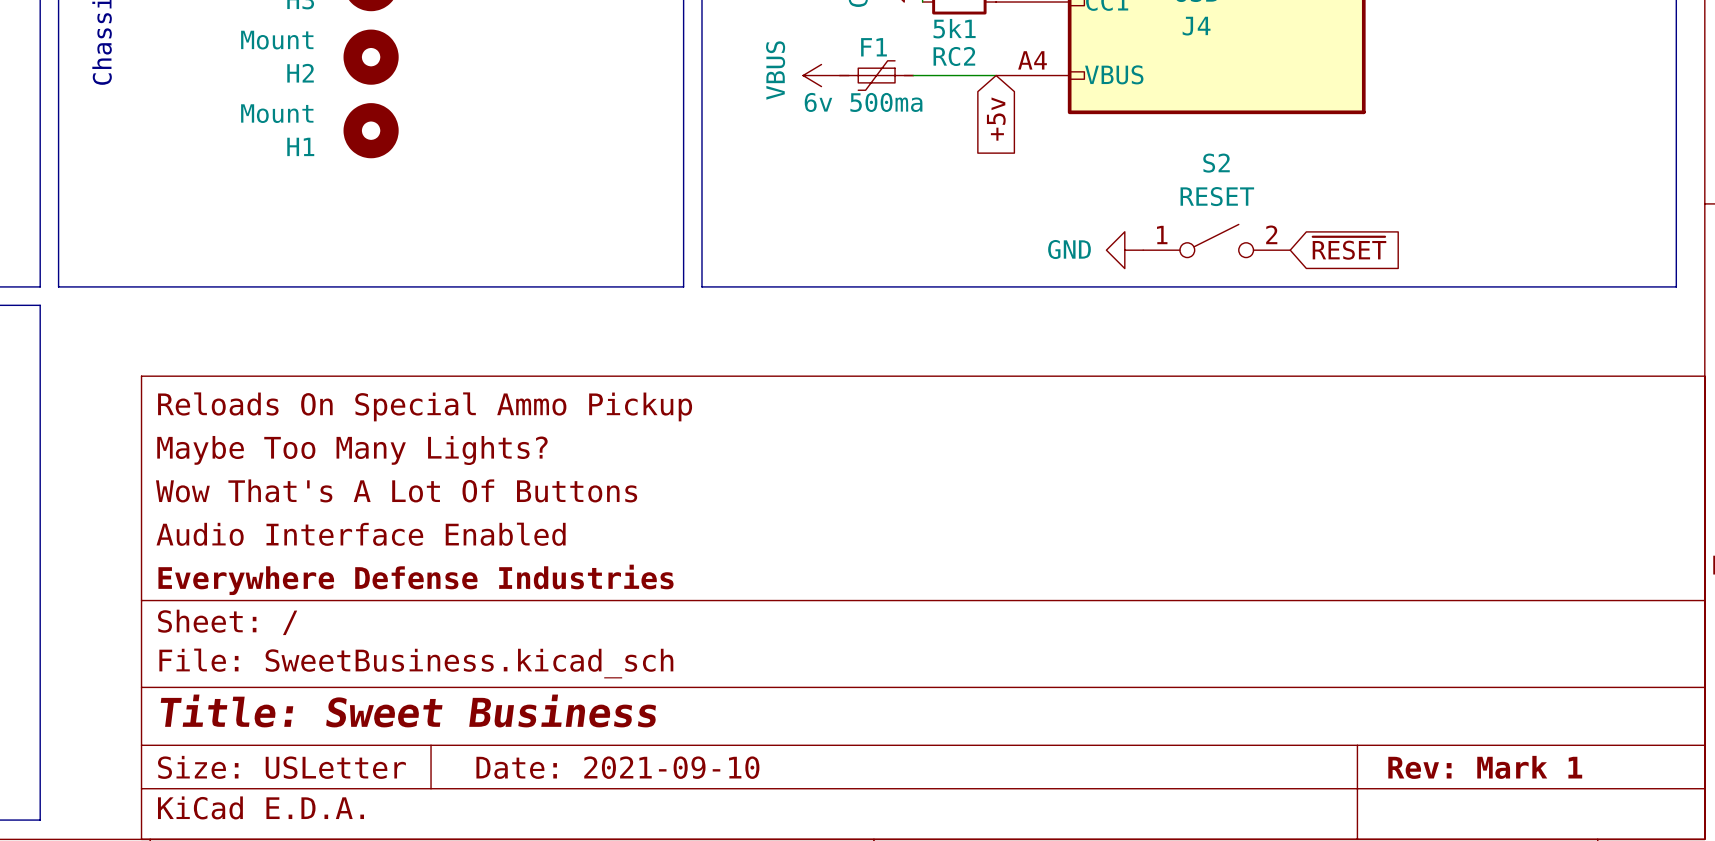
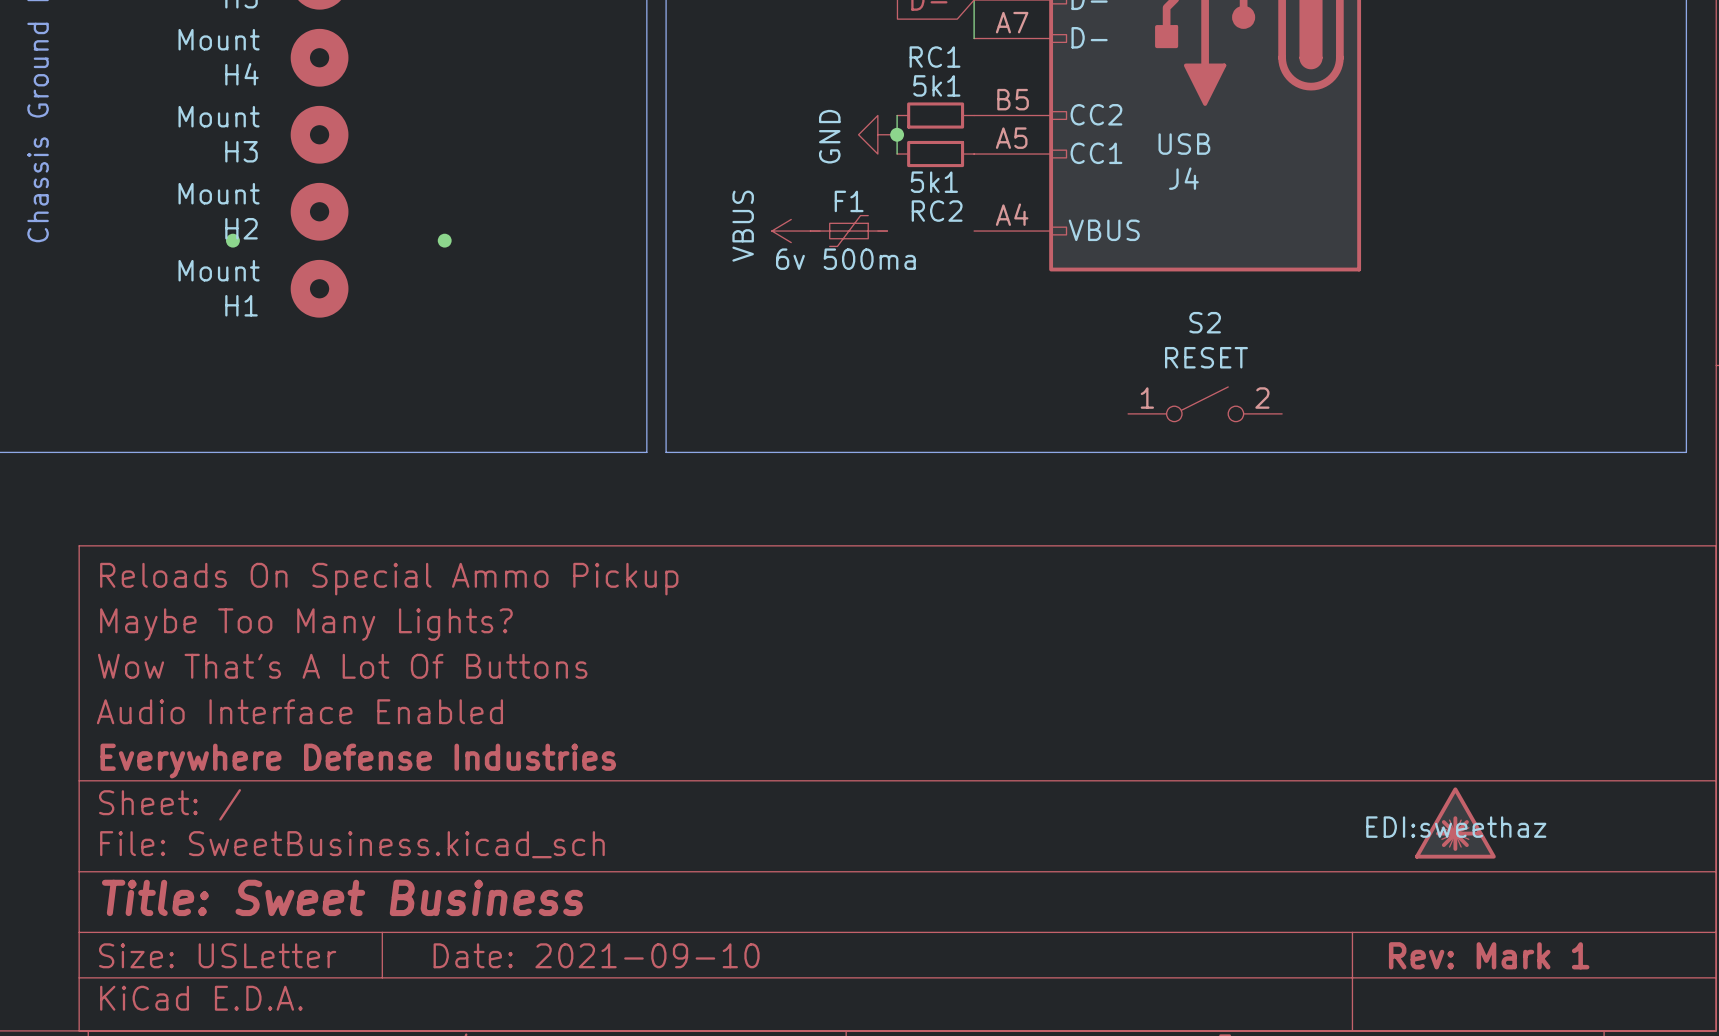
wire: (913, 75) (996, 75) -> none
junction: none -> (232, 240)
junction: none -> (444, 240)
global label: +5v (996, 119) -> none
global label: ~{RESET} (1349, 248) -> none
power symbol: GND (1124, 250) -> none
part: none -> (1455, 822)

